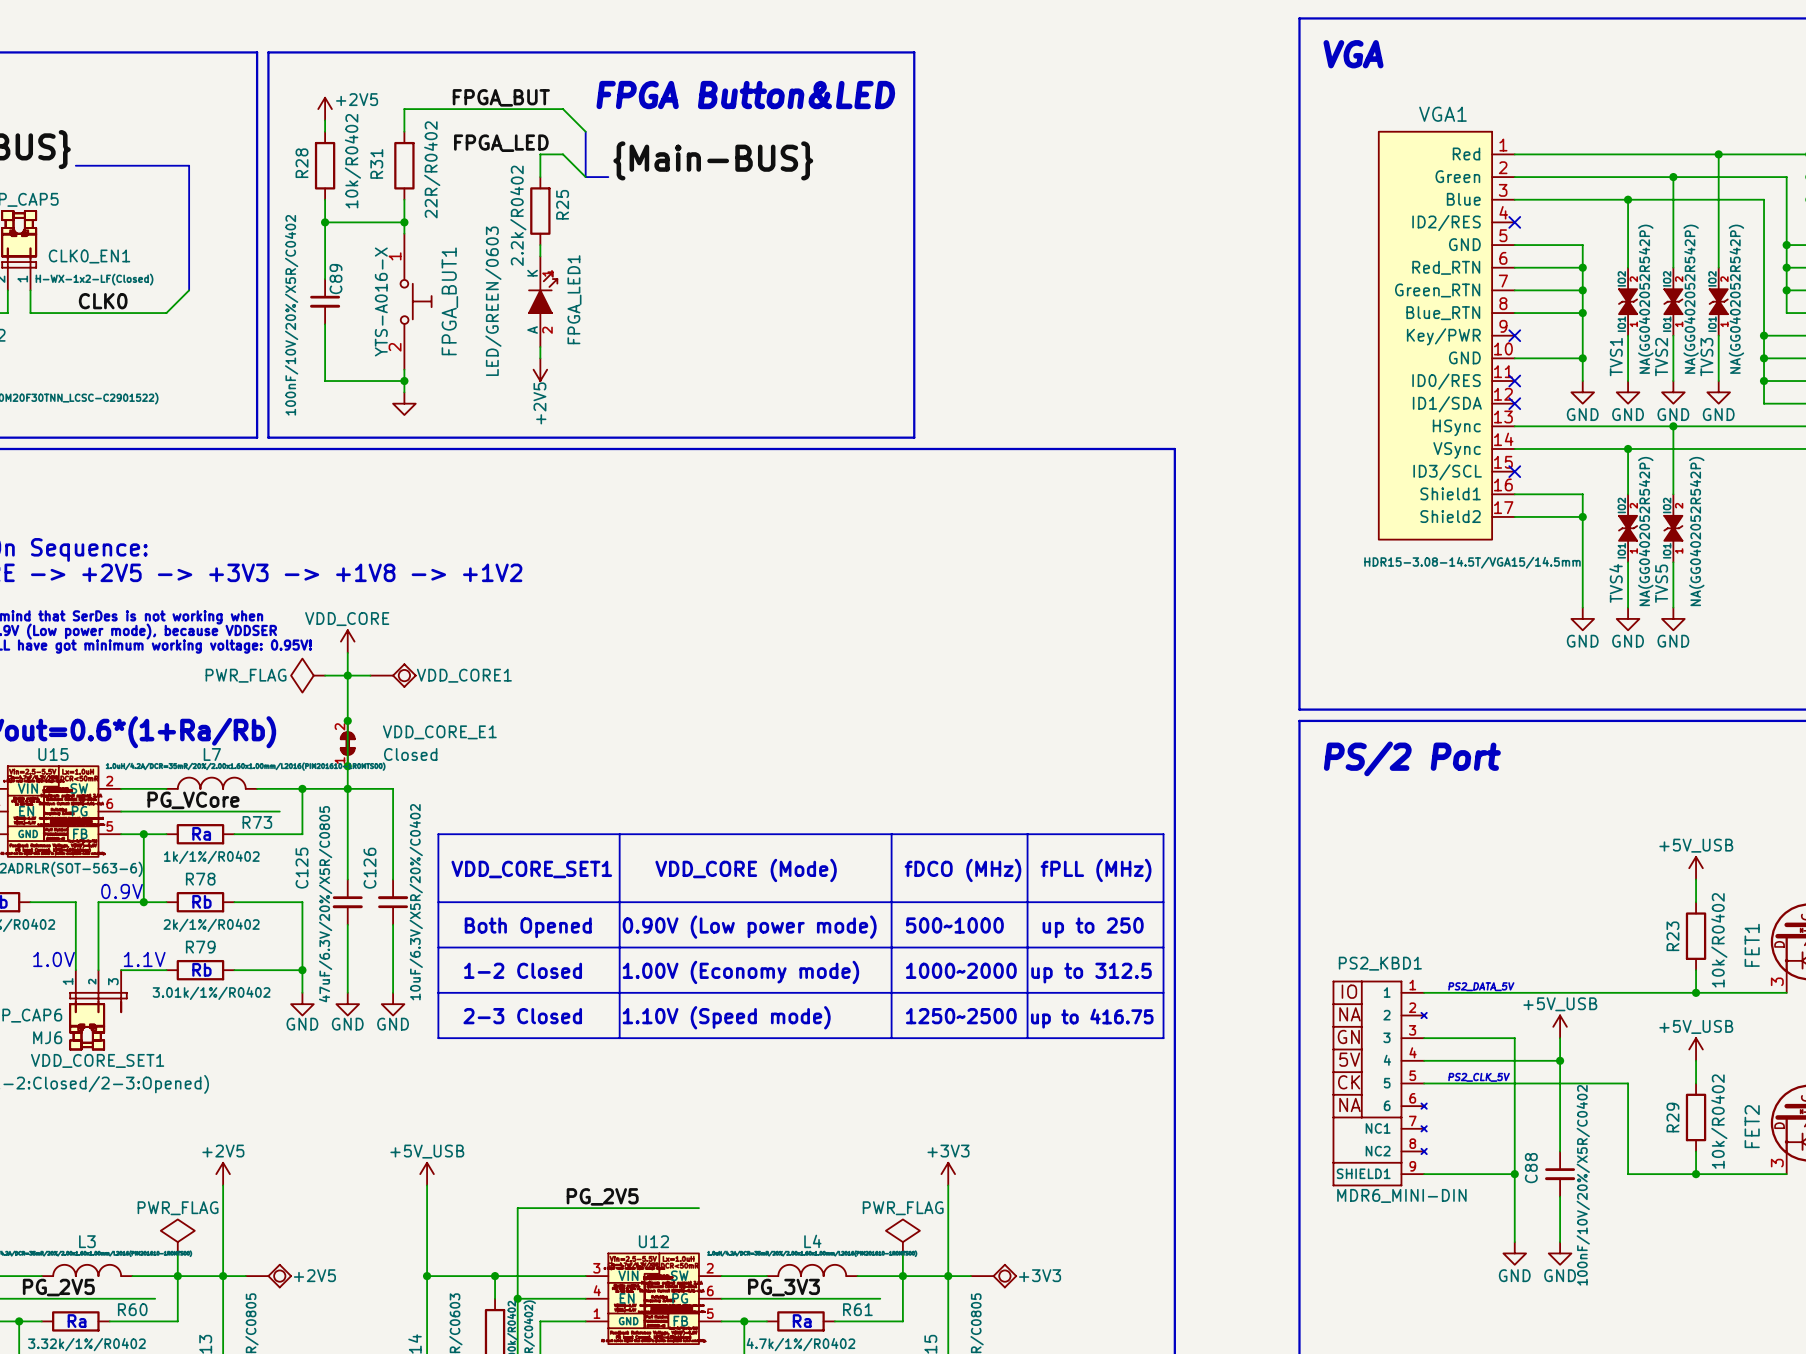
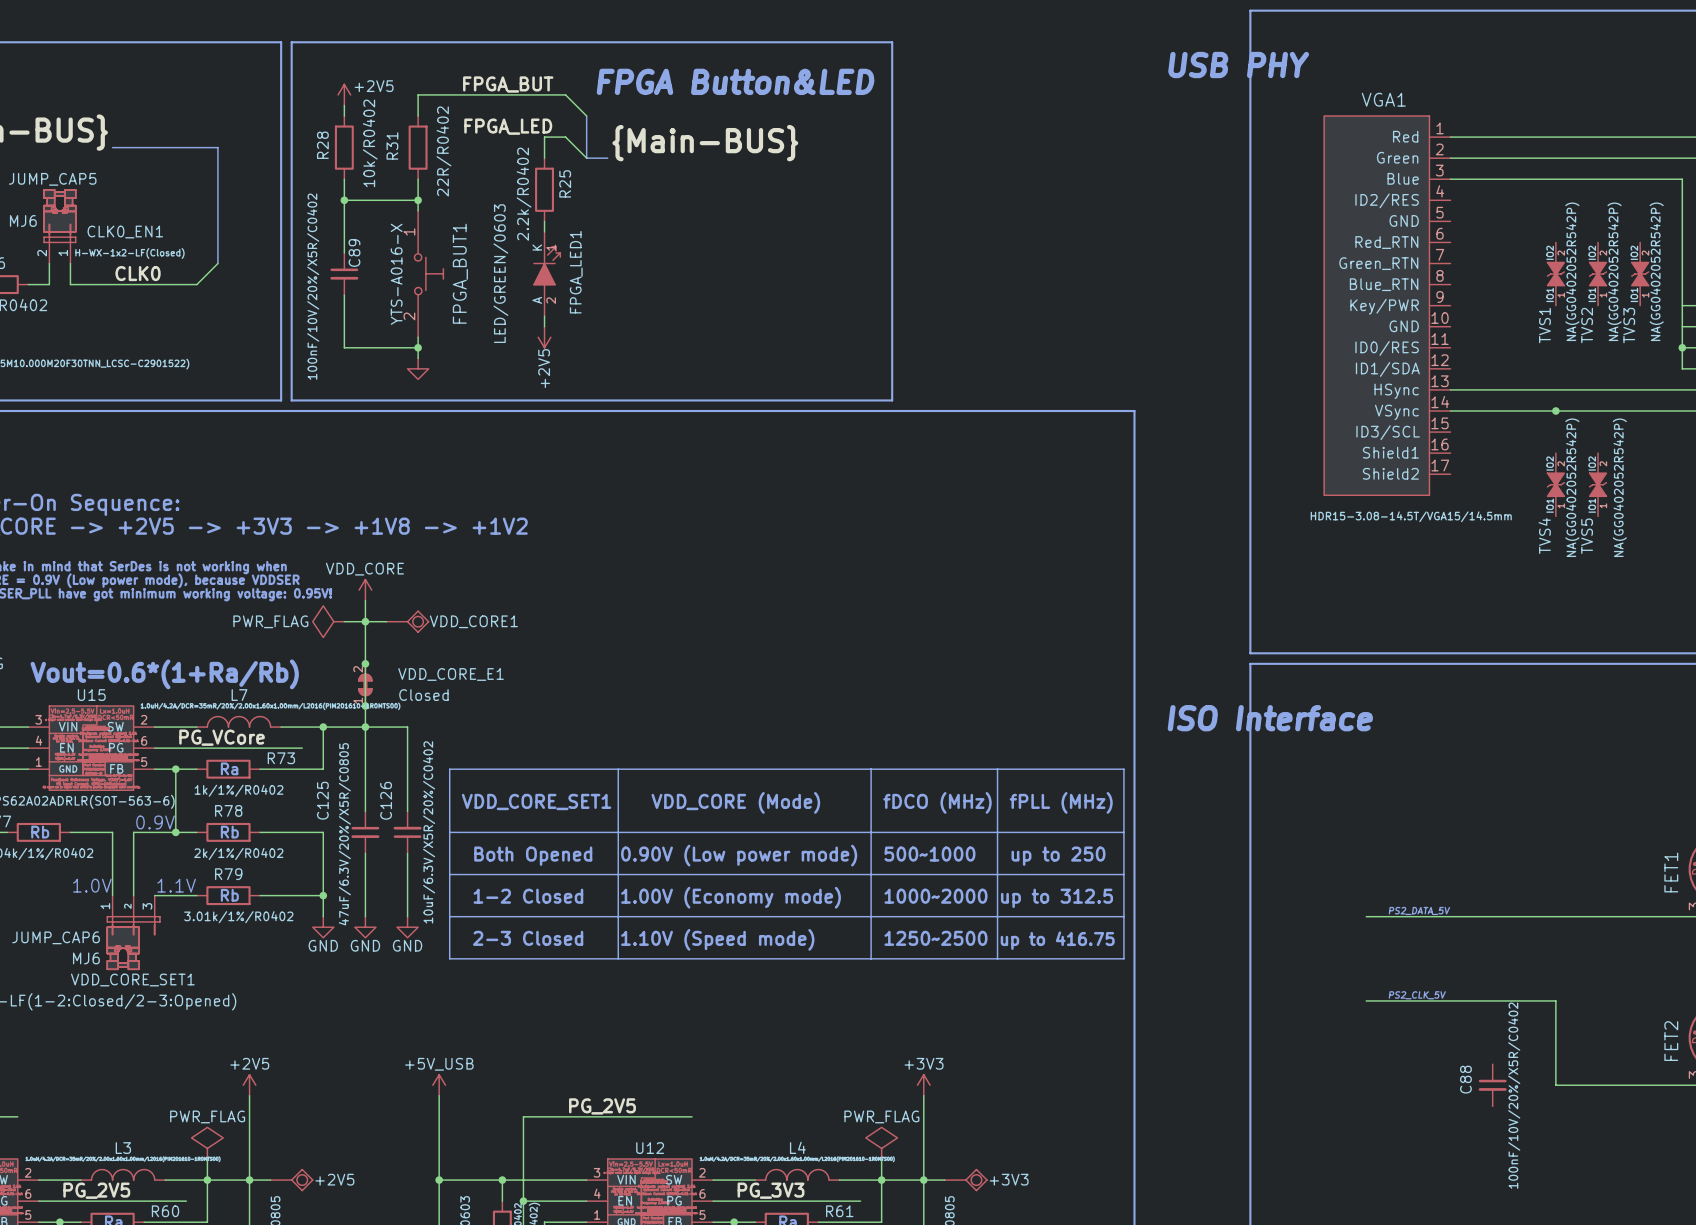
text: VGA (1353, 54) -> none
text: none -> USB PHY (1238, 65)
wire: (1718, 154) (1718, 267) -> none
junction: (1718, 154) -> none
wire: (1673, 177) (1673, 267) -> none
junction: (1673, 177) -> none
wire: (1628, 199) (1628, 267) -> none
junction: (1628, 199) -> none
no-connect mark: (1514, 222) -> none
wire: (1514, 245) (1582, 245) (1582, 381) -> none
wire: (1514, 267) (1582, 267) -> none
junction: (1582, 267) -> none
wire: (1514, 290) (1582, 290) -> none
junction: (1582, 290) -> none
wire: (1514, 313) (1582, 313) -> none
junction: (1582, 313) -> none
no-connect mark: (1514, 335) -> none
wire: (1628, 335) (1628, 381) -> none
wire: (1673, 335) (1673, 381) -> none
wire: (1718, 335) (1718, 381) -> none
junction: (1764, 335) -> none
wire: (1514, 358) (1582, 358) -> none
junction: (1582, 358) -> none
junction: (1764, 358) -> none
no-connect mark: (1514, 381) -> none
power symbol: GND (1582, 392) -> none
power symbol: GND (1628, 392) -> none
power symbol: GND (1673, 392) -> none
power symbol: GND (1718, 392) -> none
no-connect mark: (1514, 403) -> none
wire: (1673, 426) (1673, 494) -> none
junction: (1673, 426) -> none
wire: (1628, 448) (1628, 494) -> none
no-connect mark: (1514, 471) -> none
wire: (1514, 494) (1582, 494) (1582, 607) -> none
wire: (1514, 516) (1582, 516) -> none
junction: (1582, 516) -> none
wire: (1628, 562) (1628, 607) -> none
wire: (1673, 562) (1673, 607) -> none
power symbol: GND (1582, 618) -> none
power symbol: GND (1628, 618) -> none
power symbol: GND (1673, 618) -> none
text: PS/2 Port (1412, 758) -> none
text: none -> ISO Interface (1270, 718)
power symbol: +5V_USB (1696, 868) -> none
wire: (1696, 879) (1696, 902) -> none
R23: 10k/R0402 (1696, 936) -> none
wire: (1696, 970) (1696, 992) -> none
junction: (1696, 992) -> none
power symbol: +5V_USB (1560, 1026) -> none
wire: (1424, 1038) (1514, 1038) (1514, 1242) -> none
wire: (1560, 1038) (1560, 1151) -> none
power symbol: +5V_USB (1696, 1049) -> none
wire: (1424, 1060) (1560, 1060) -> none
junction: (1560, 1060) -> none
wire: (1696, 1060) (1696, 1083) -> none
PS2_KBD1: MDR6_MINI-DIN (1380, 1083) -> none
R29: 10k/R0402 (1696, 1117) -> none
wire: (1696, 1151) (1696, 1174) -> none
wire: (1424, 1174) (1514, 1174) -> none
junction: (1514, 1174) -> none
junction: (1696, 1174) -> none
wire: (1560, 1196) (1560, 1242) -> none
power symbol: GND (1514, 1253) -> none
power symbol: GND (1560, 1253) -> none

